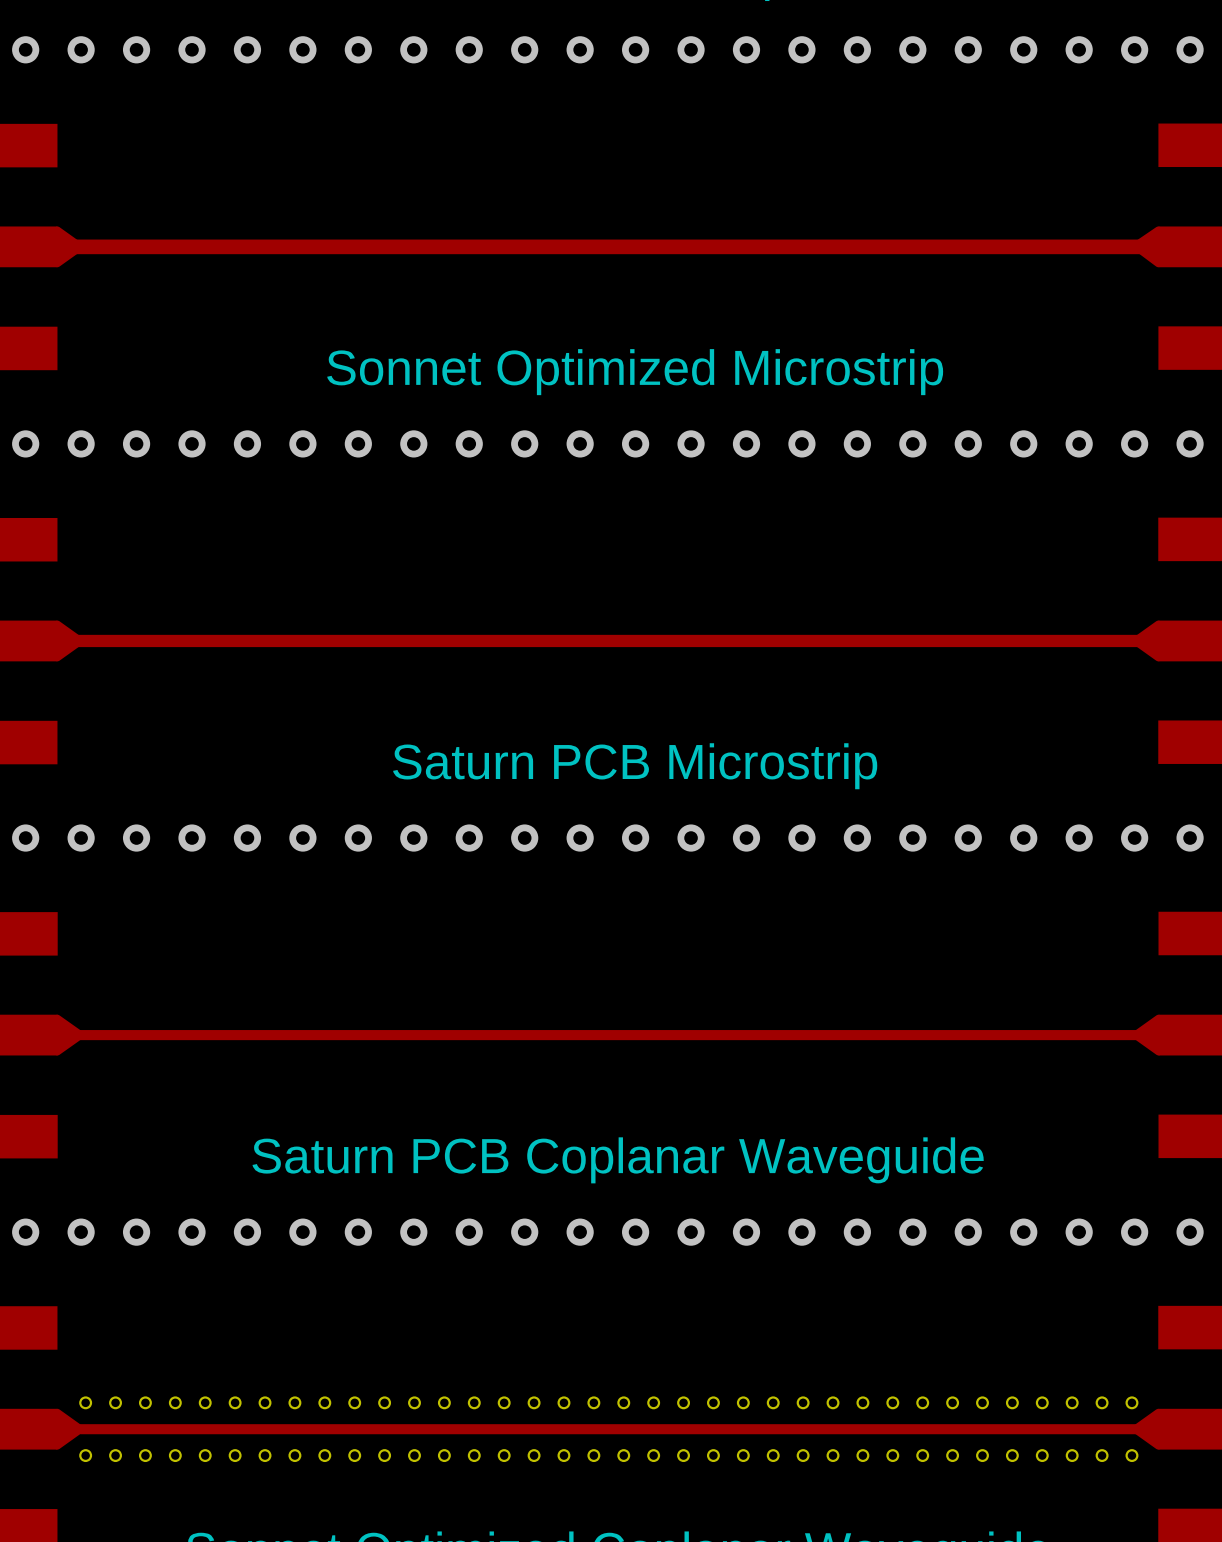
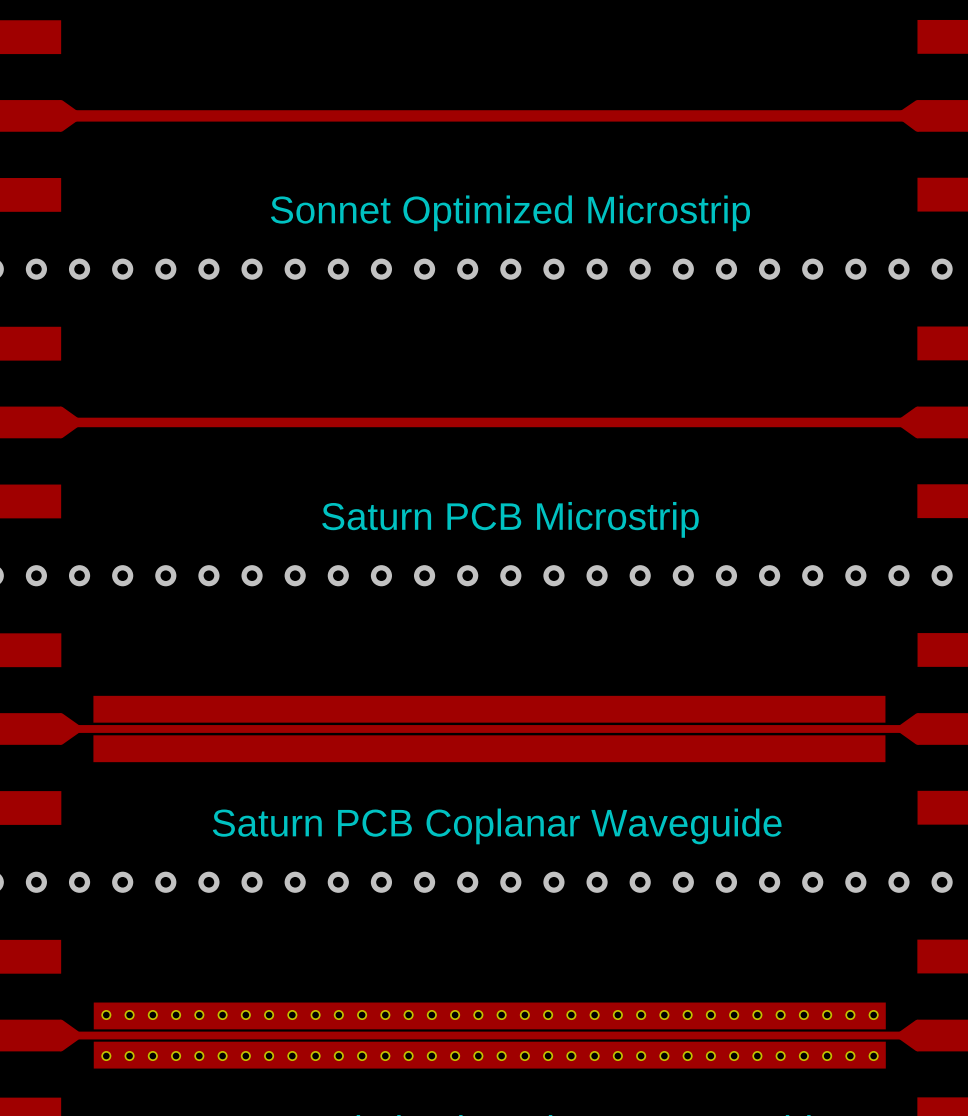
part footprint: [75, 1030, 1141, 1041] -> [75, 695, 904, 763]
part footprint: [75, 1396, 1142, 1463] -> [75, 1002, 905, 1069]

